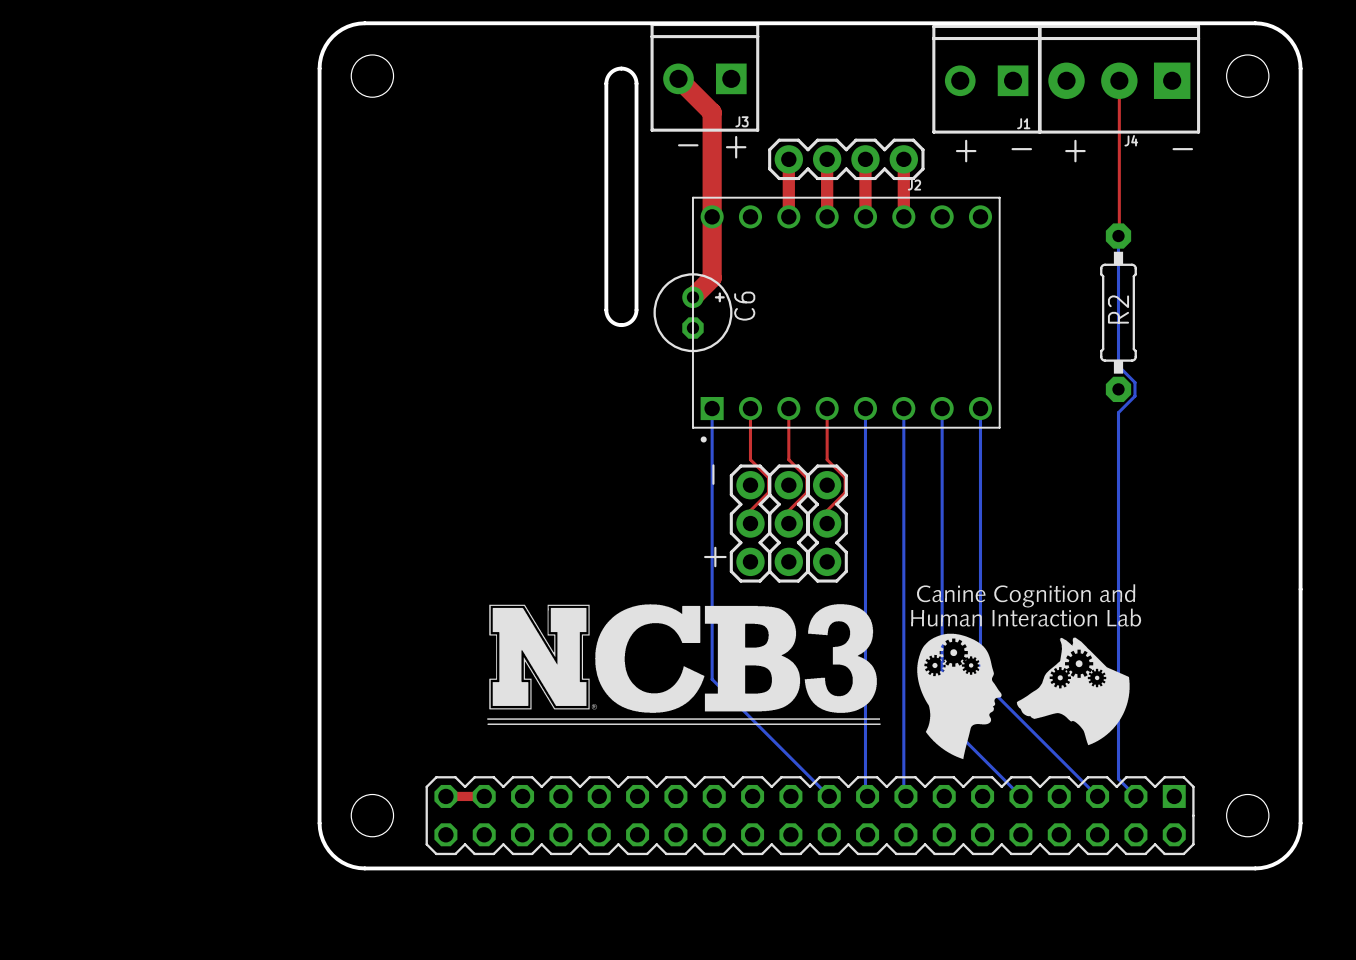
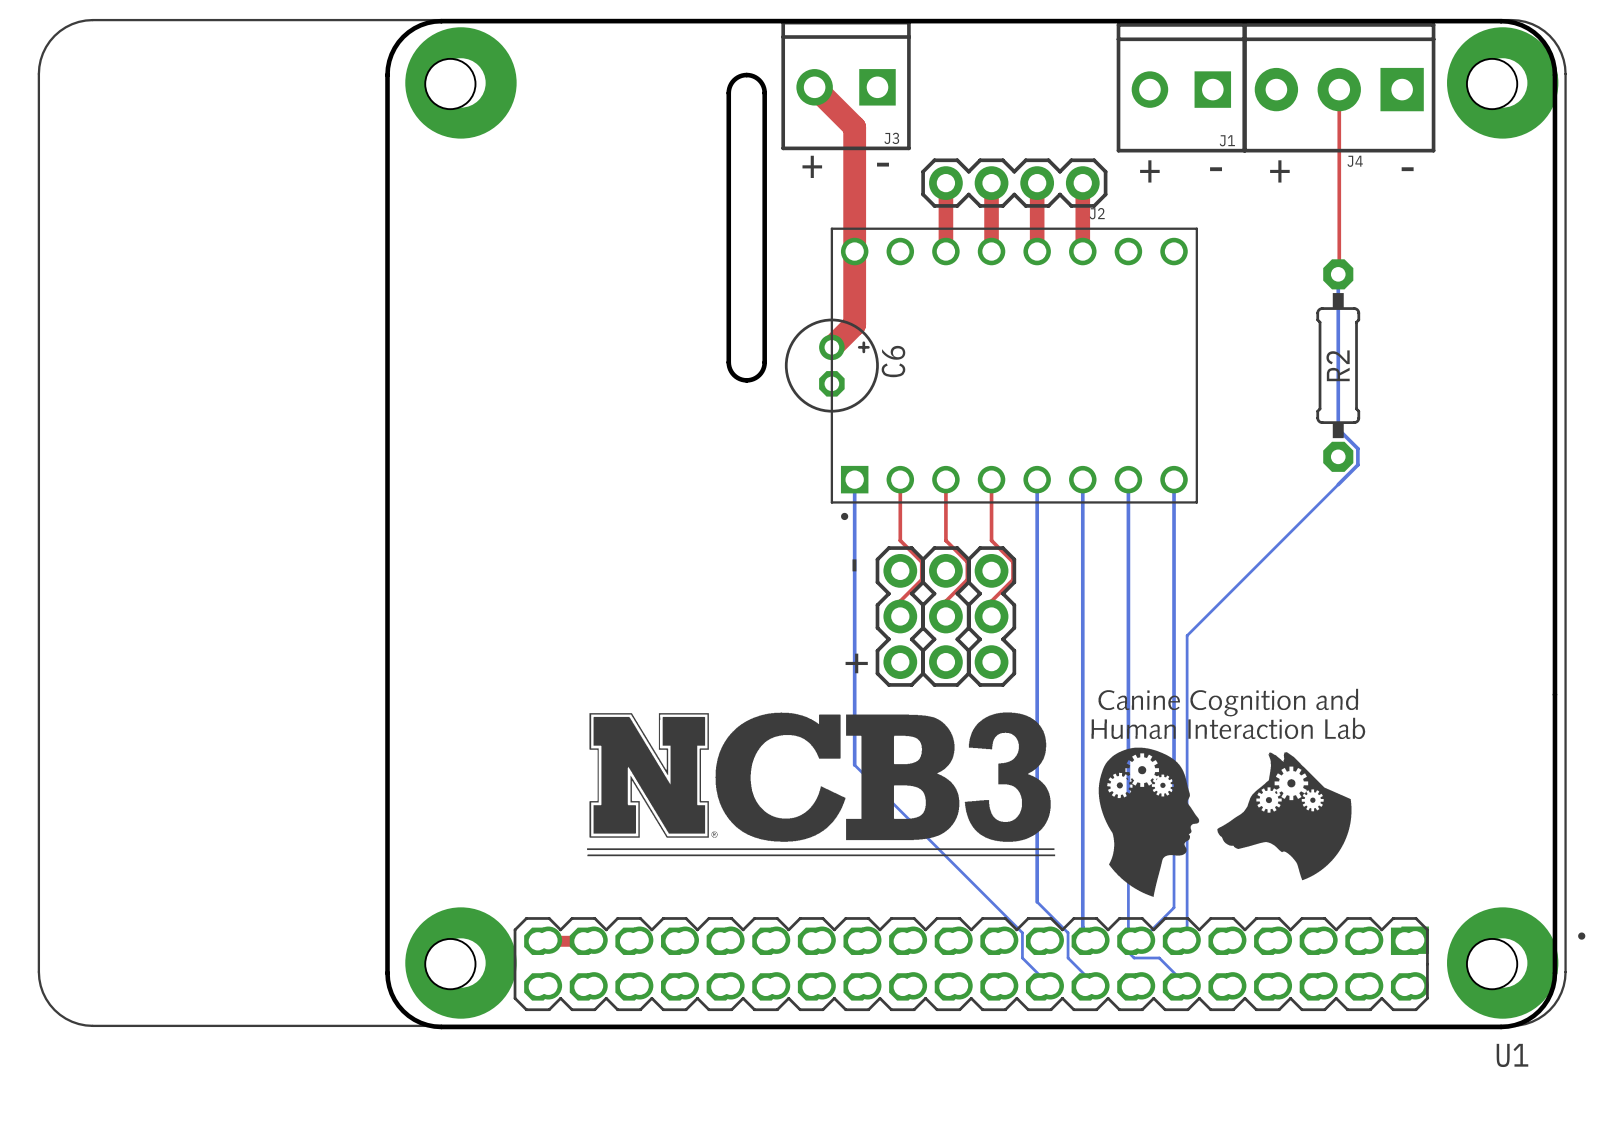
text position: - (688, 145) -> - (883, 164)
text position: + (736, 147) -> + (812, 166)
bottom track: (1118, 412) (1118, 779) (1135, 796) -> (1338, 484) (1187, 635) (1187, 940)
U1: none -> (811, 522)
bottom track: (712, 648) (712, 679) (829, 796) -> (854, 765) (1022, 932) (1022, 958) (1050, 985)
bottom track: (980, 679) (1097, 796) -> (1174, 801) (1174, 907) (1141, 940)
bottom track: (942, 717) (1020, 796) -> (1128, 847) (1128, 928) (1123, 932) (1123, 947) (1134, 958) (1159, 958) (1187, 985)
bottom track: (865, 763) (865, 794) (867, 796) -> (1037, 901) (1068, 932) (1068, 958) (1095, 985)

